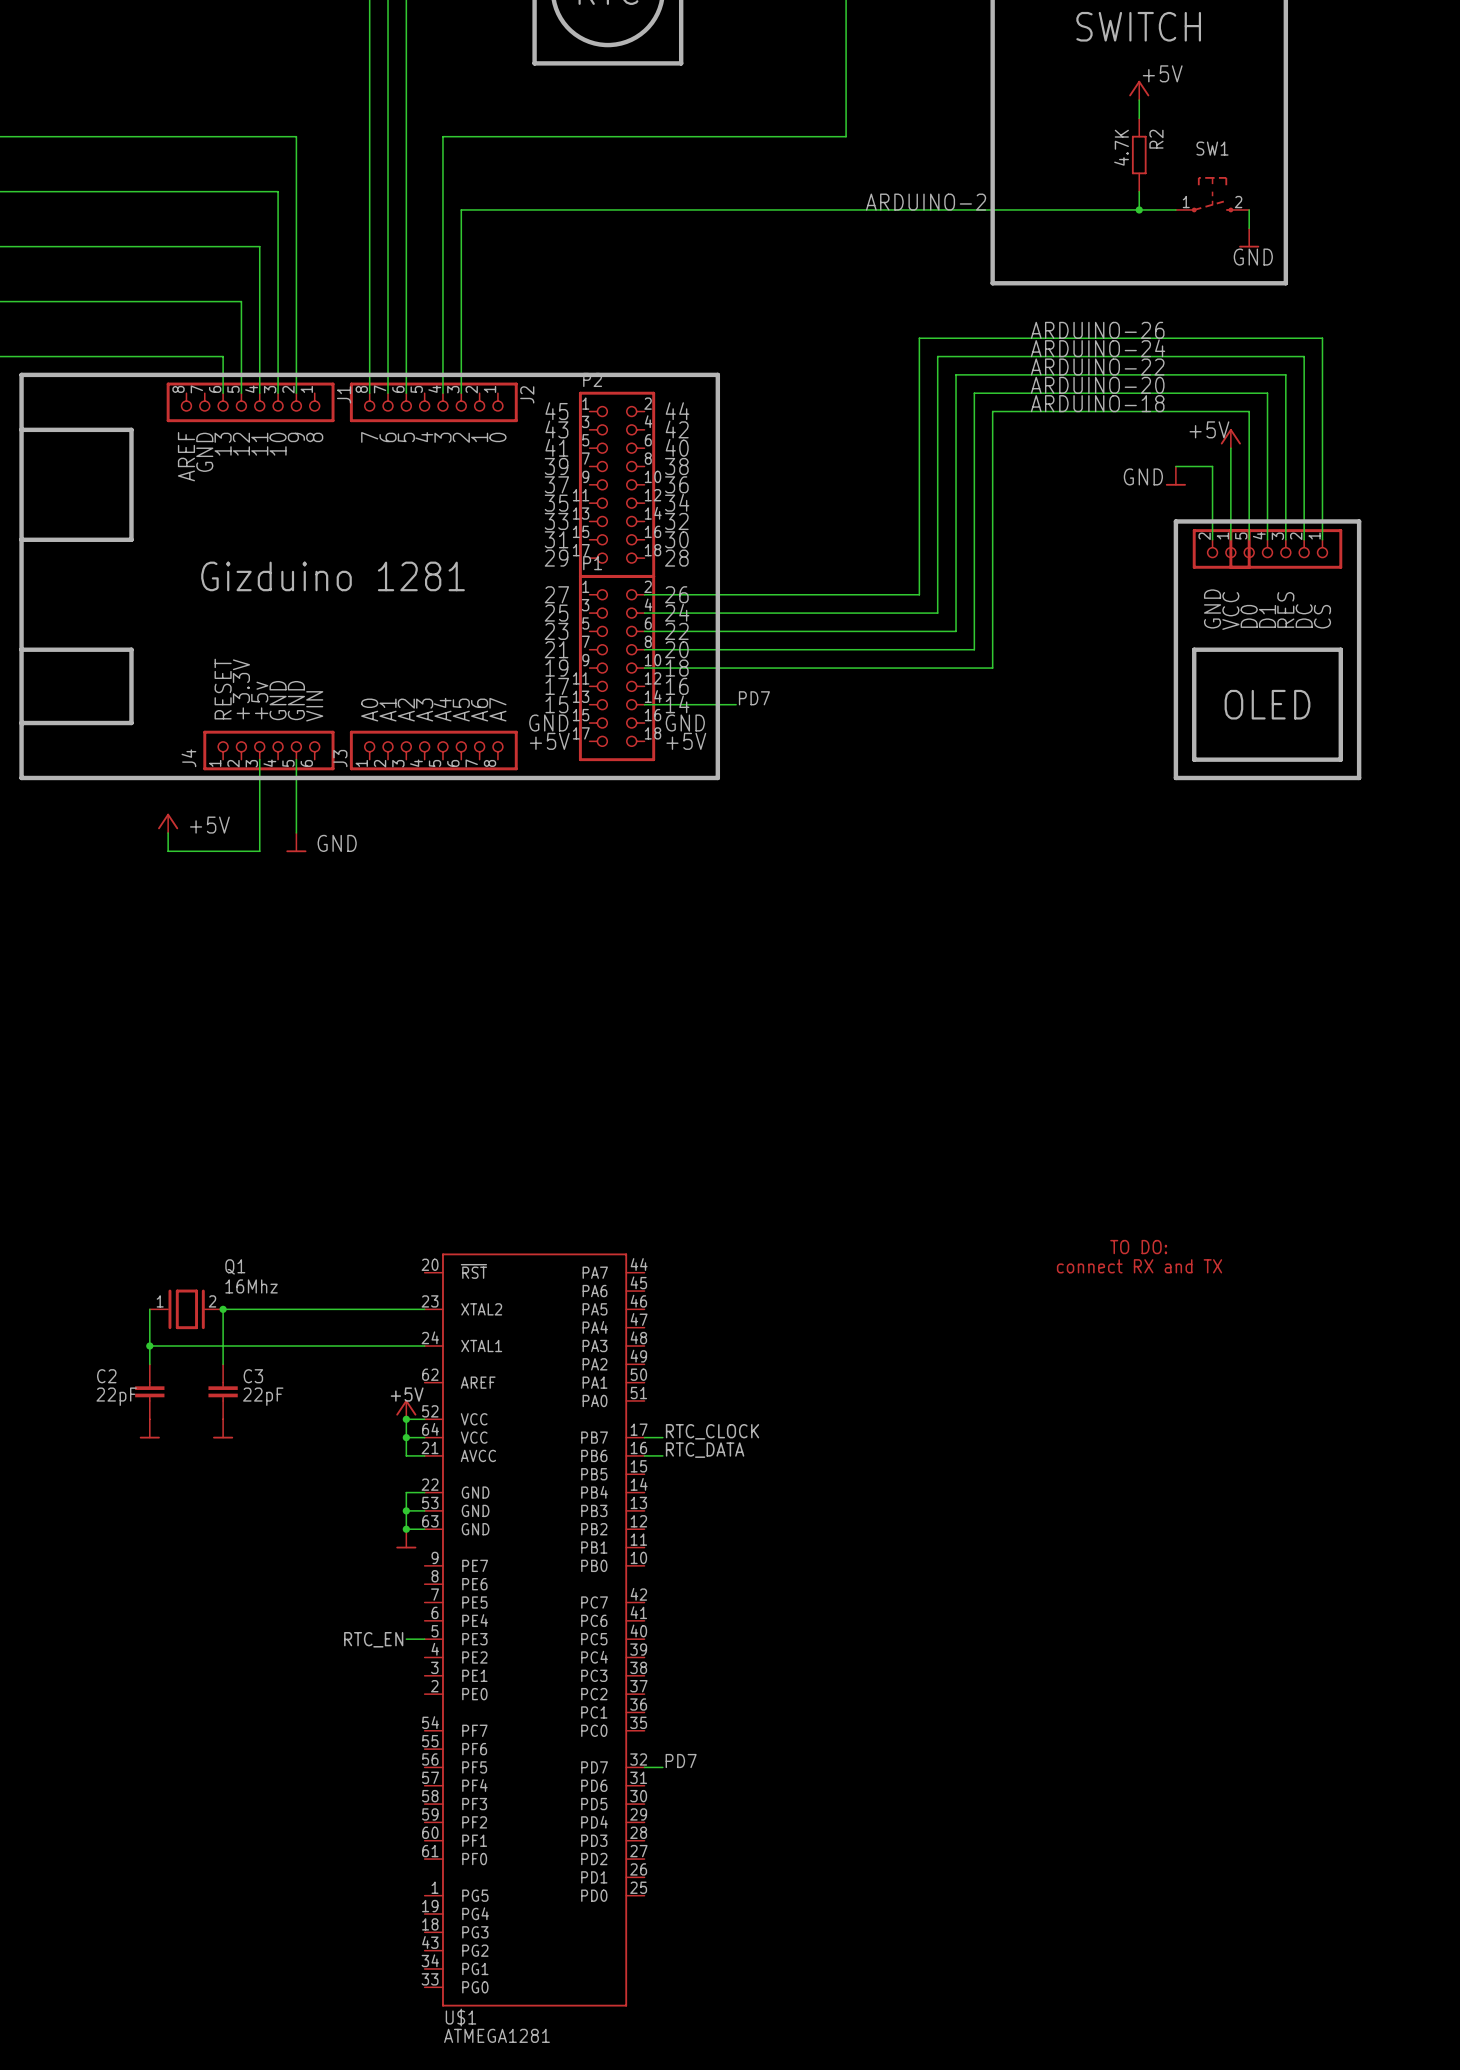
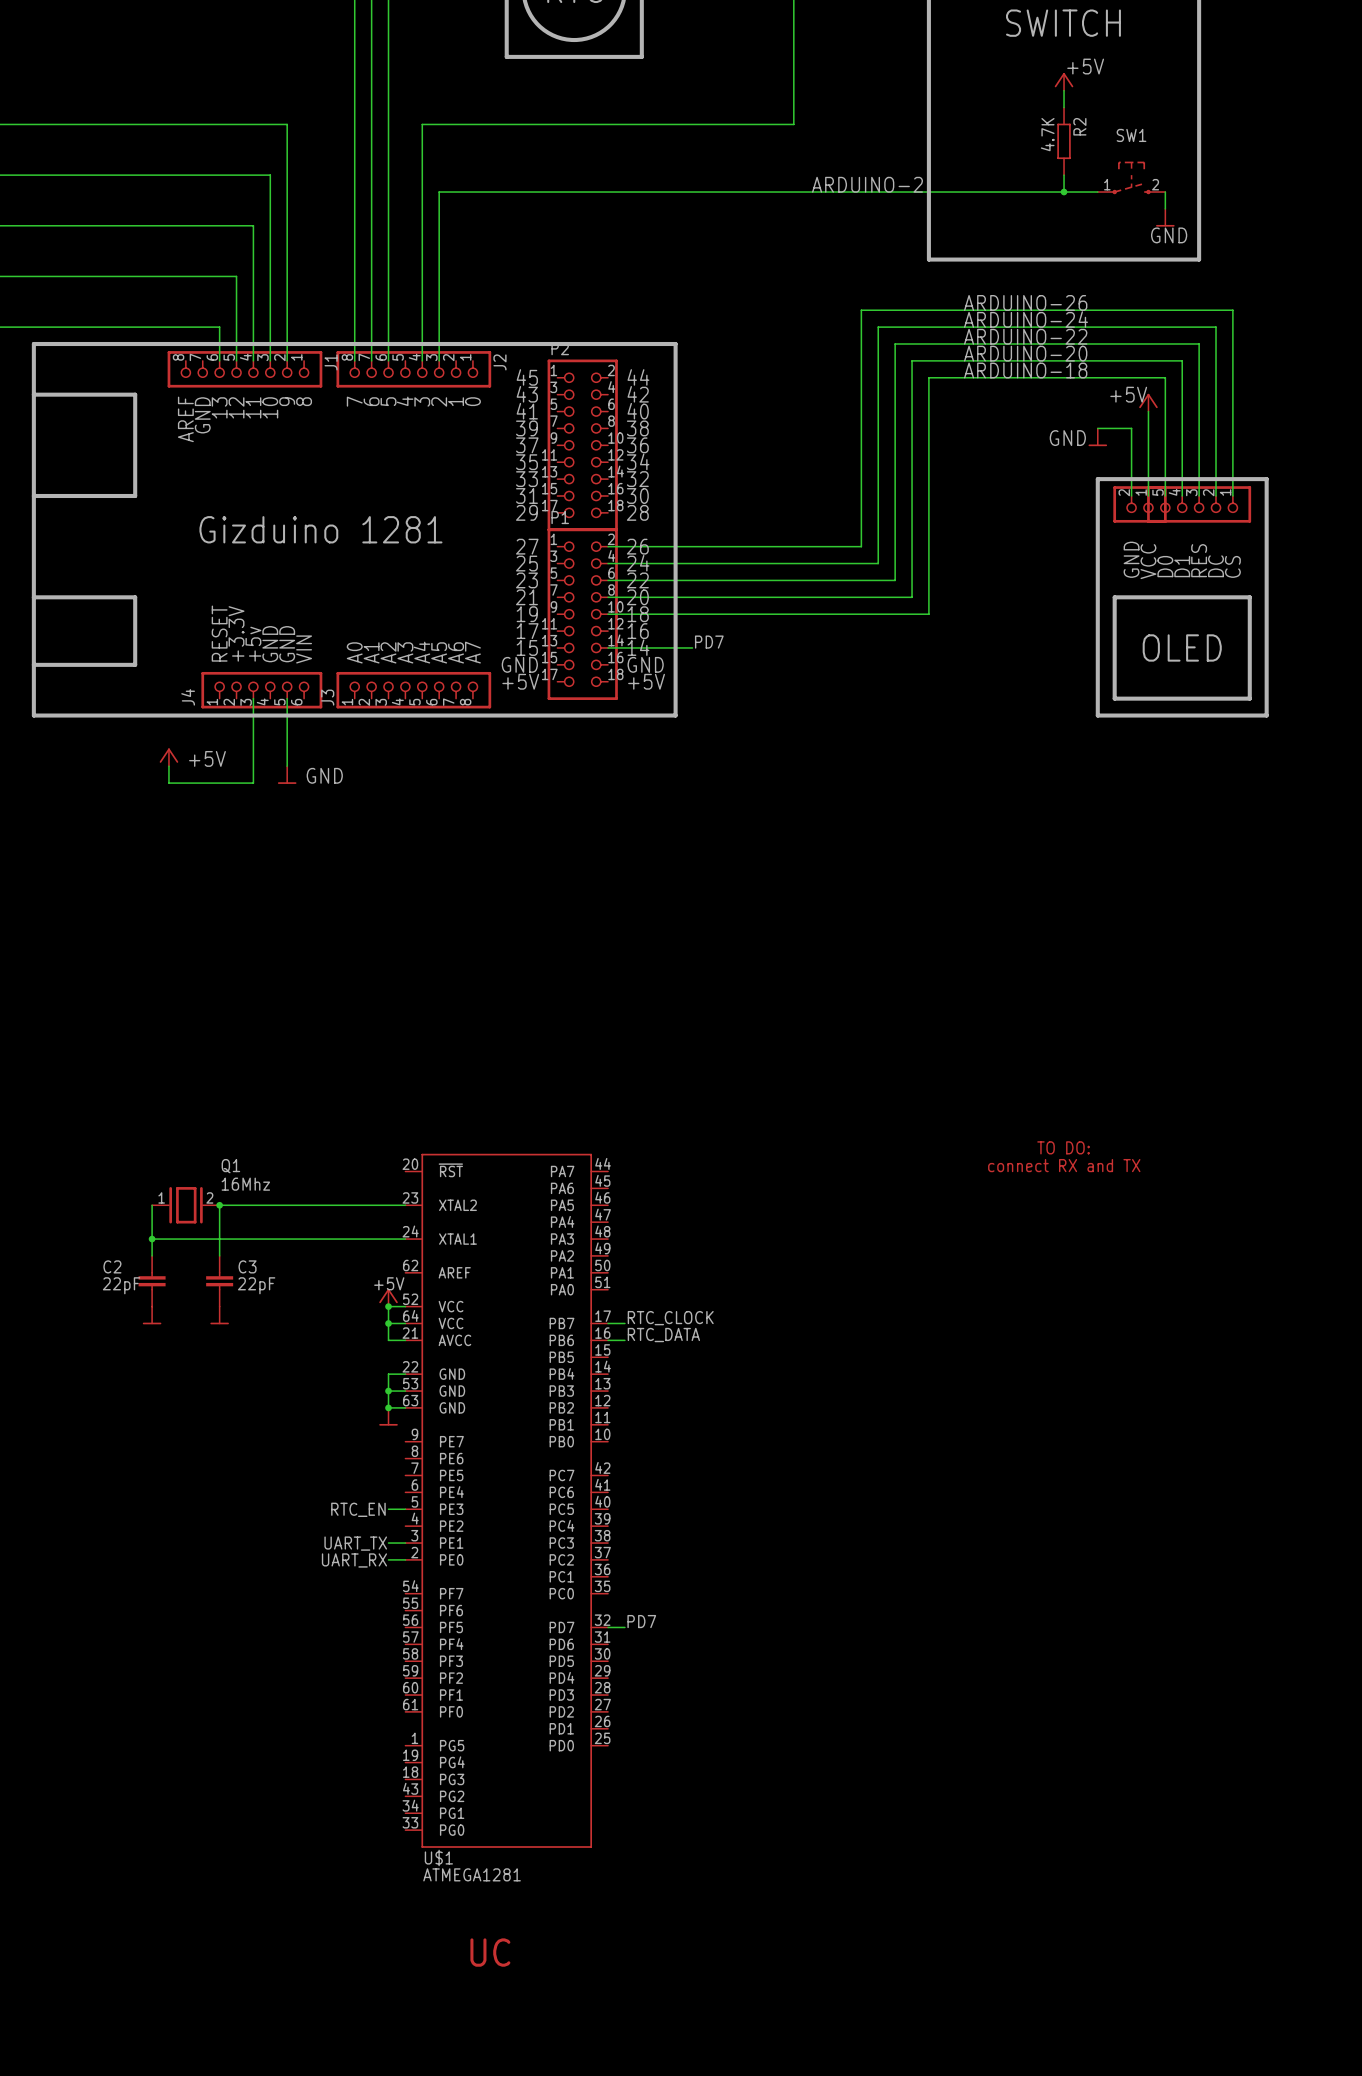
wire: none -> (388, 1543) (405, 1543)
label: none -> UART_TX (355, 1543)
label: none -> UART_RX (354, 1560)
wire: none -> (388, 1559) (405, 1559)

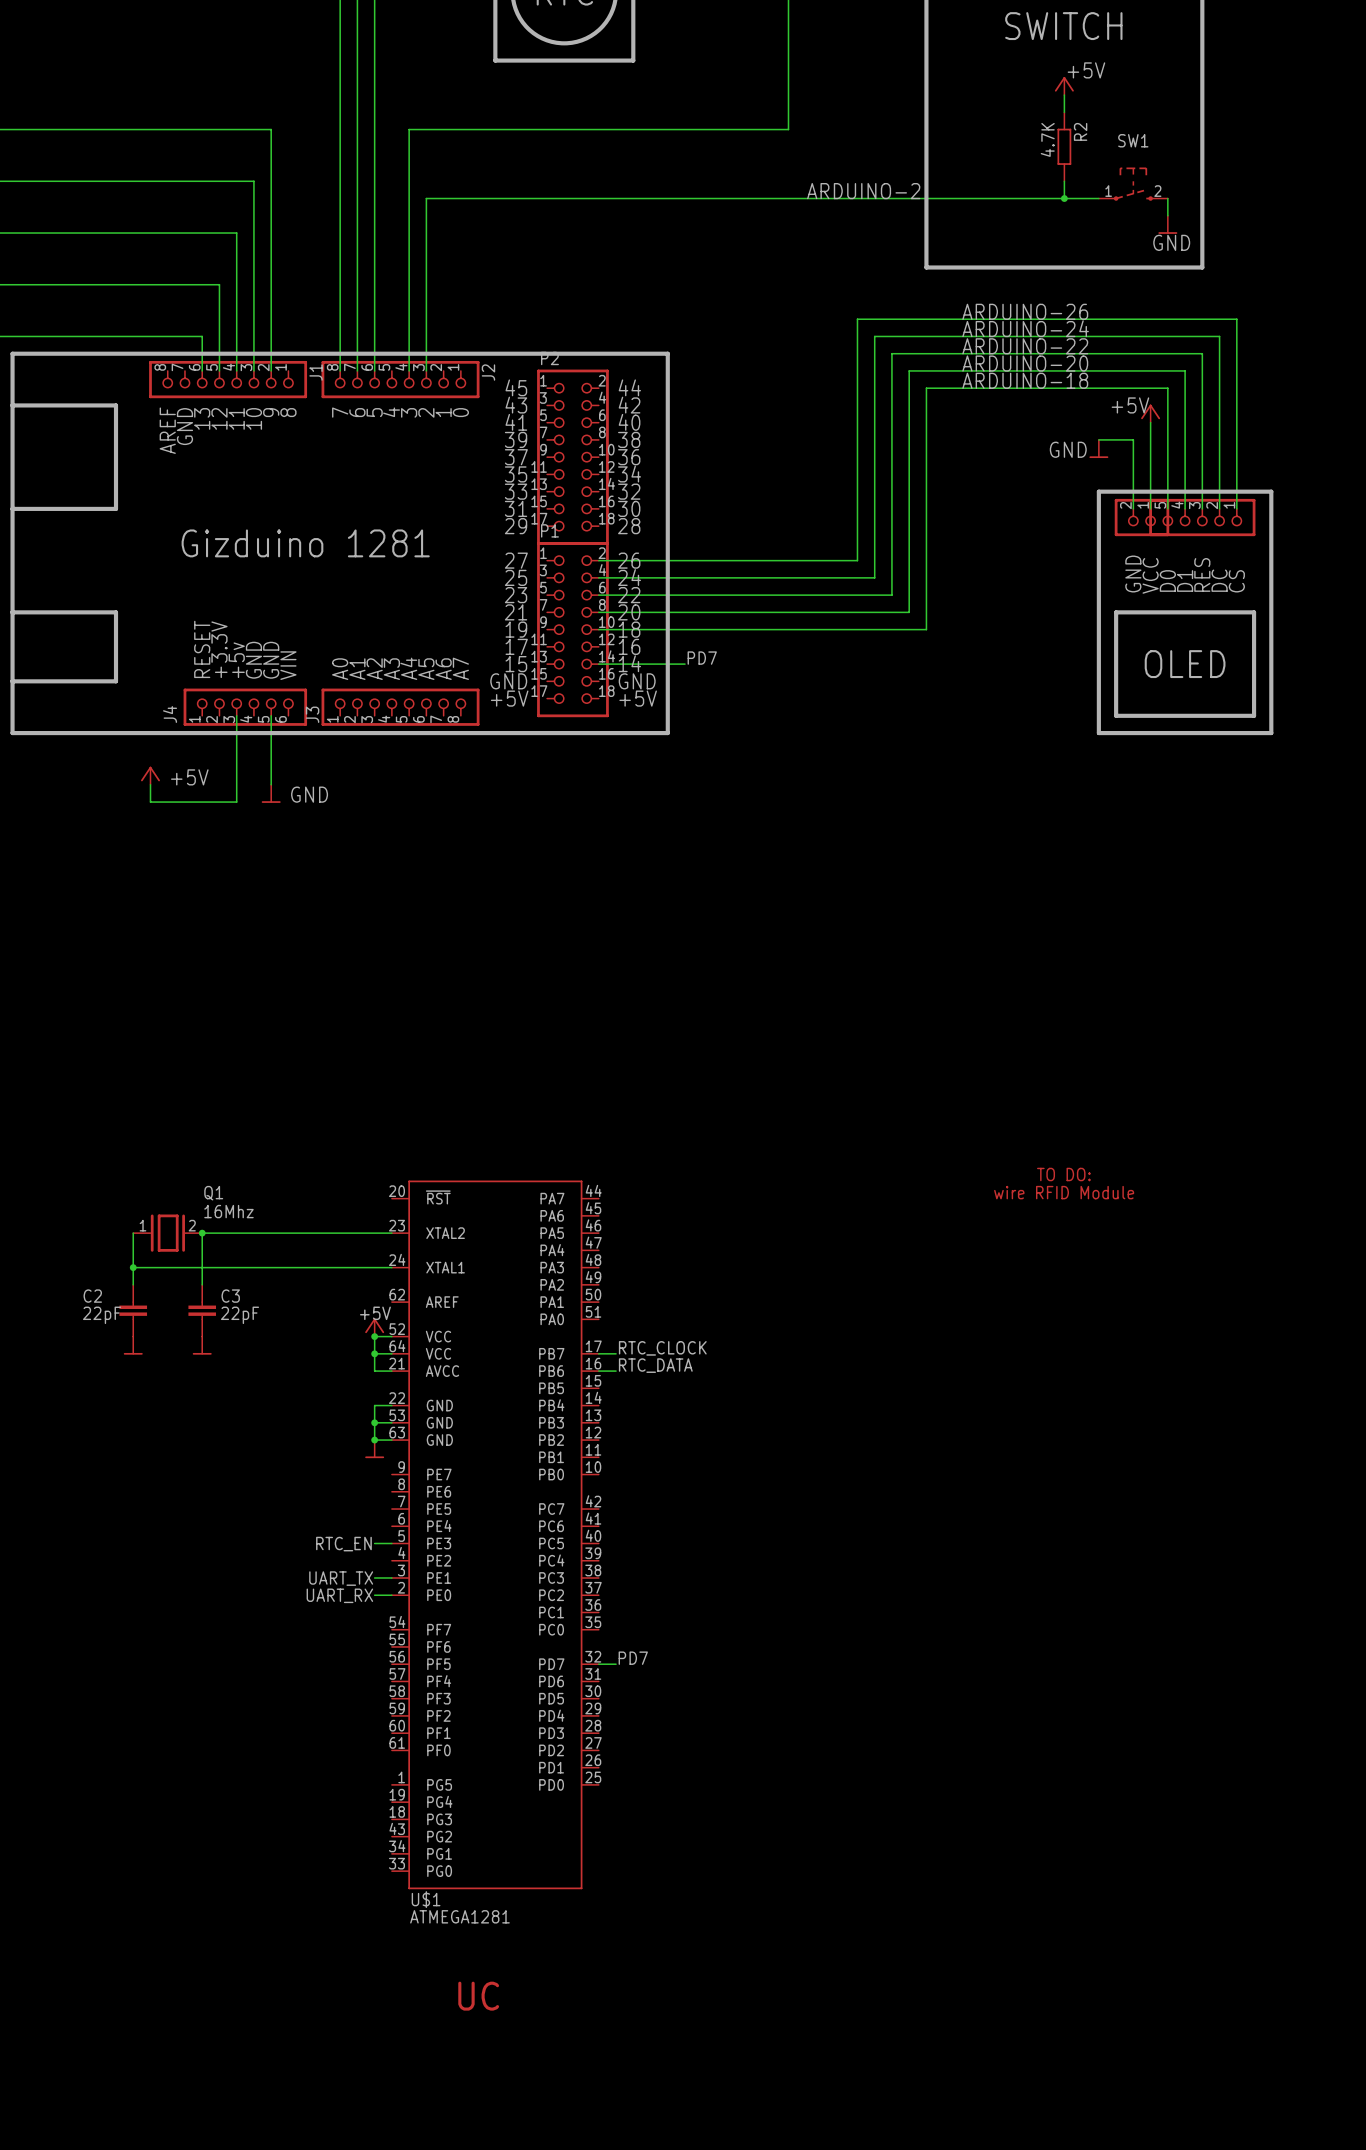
text: connect RX and TX (1064, 1165) -> wire RFID Module (1064, 1192)

